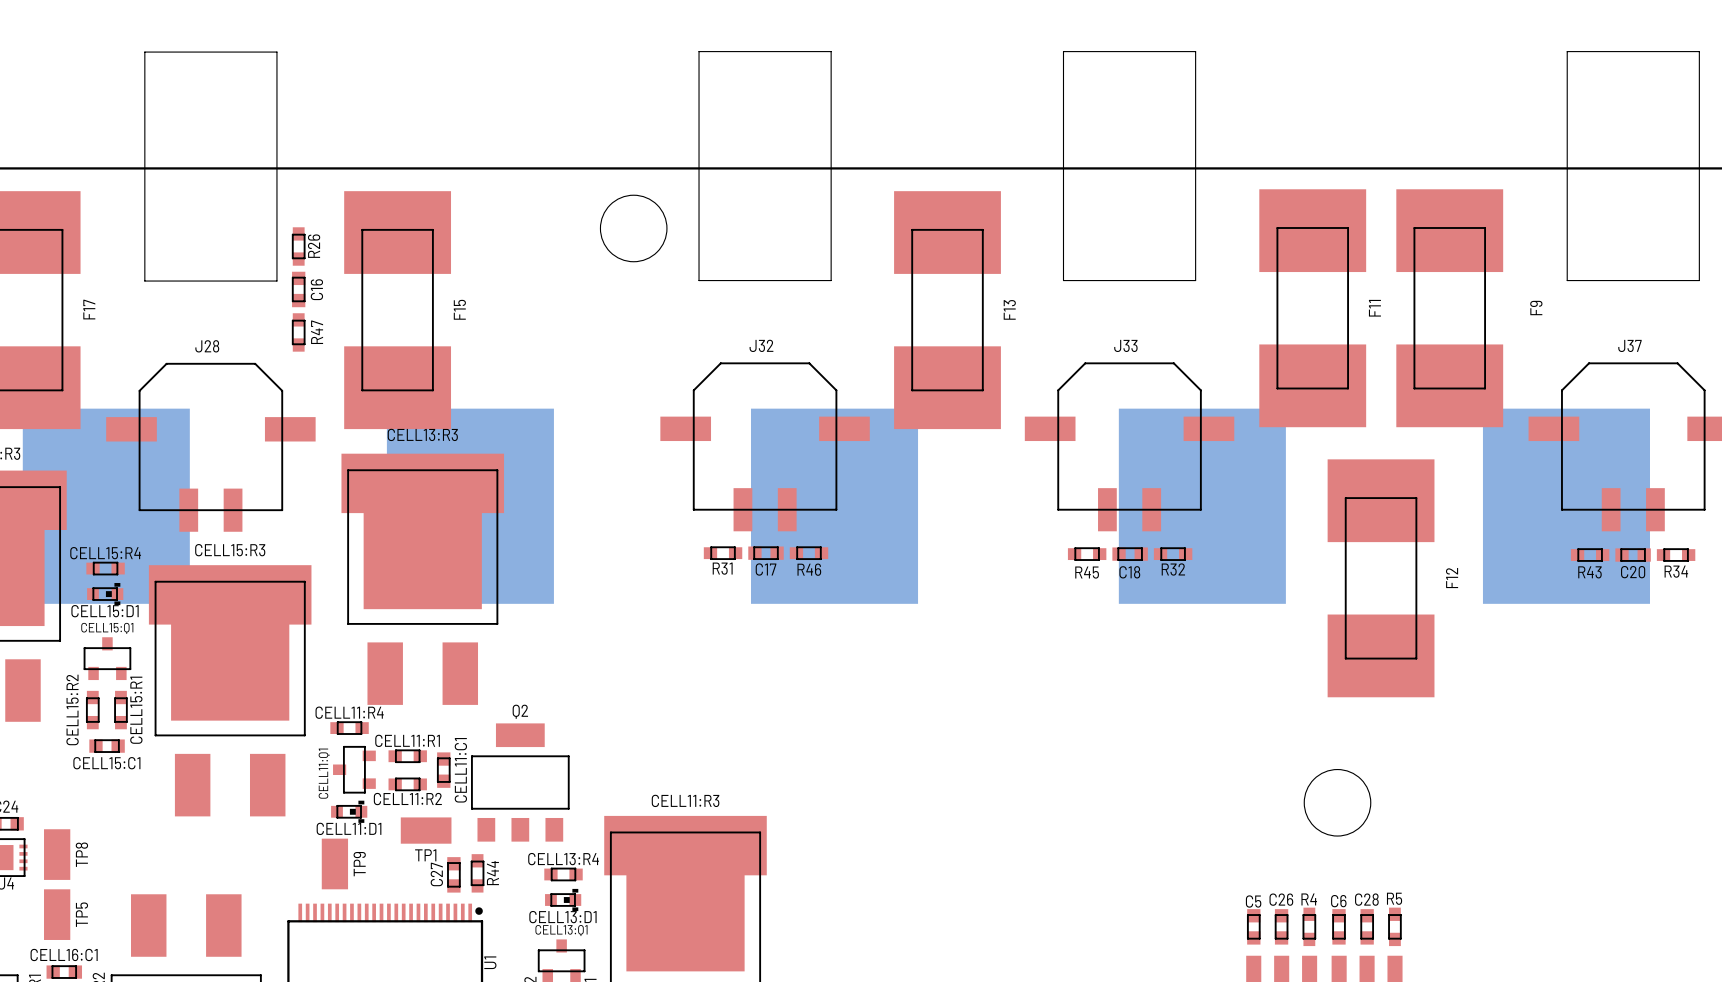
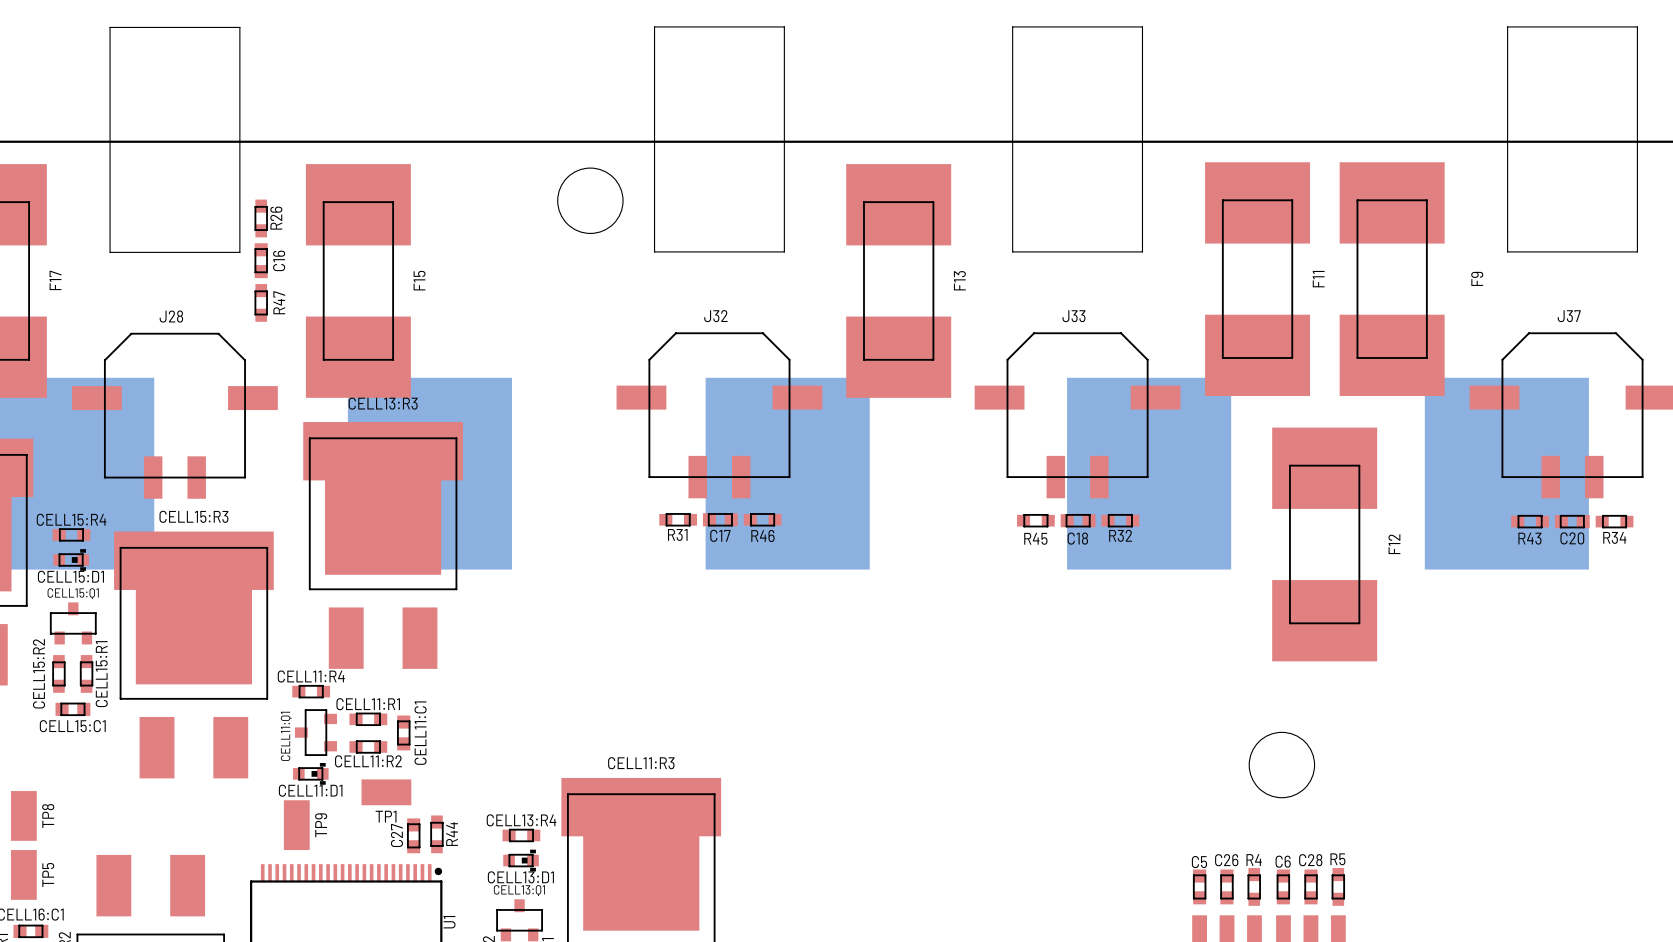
Q2: (520, 782) -> none

